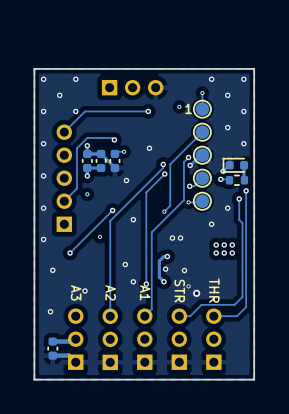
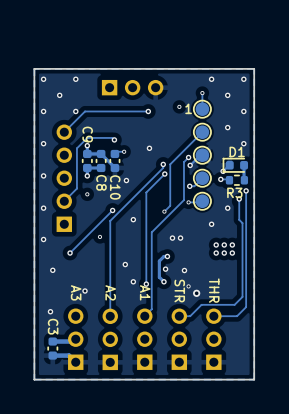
C9 name: none -> C9 (87, 134)
D1 name: none -> D1 (237, 151)
C8 name: none -> C8 (101, 182)
C10 name: none -> C10 (115, 187)
R3 name: none -> R3 (234, 192)
C3 name: none -> C3 (53, 326)

